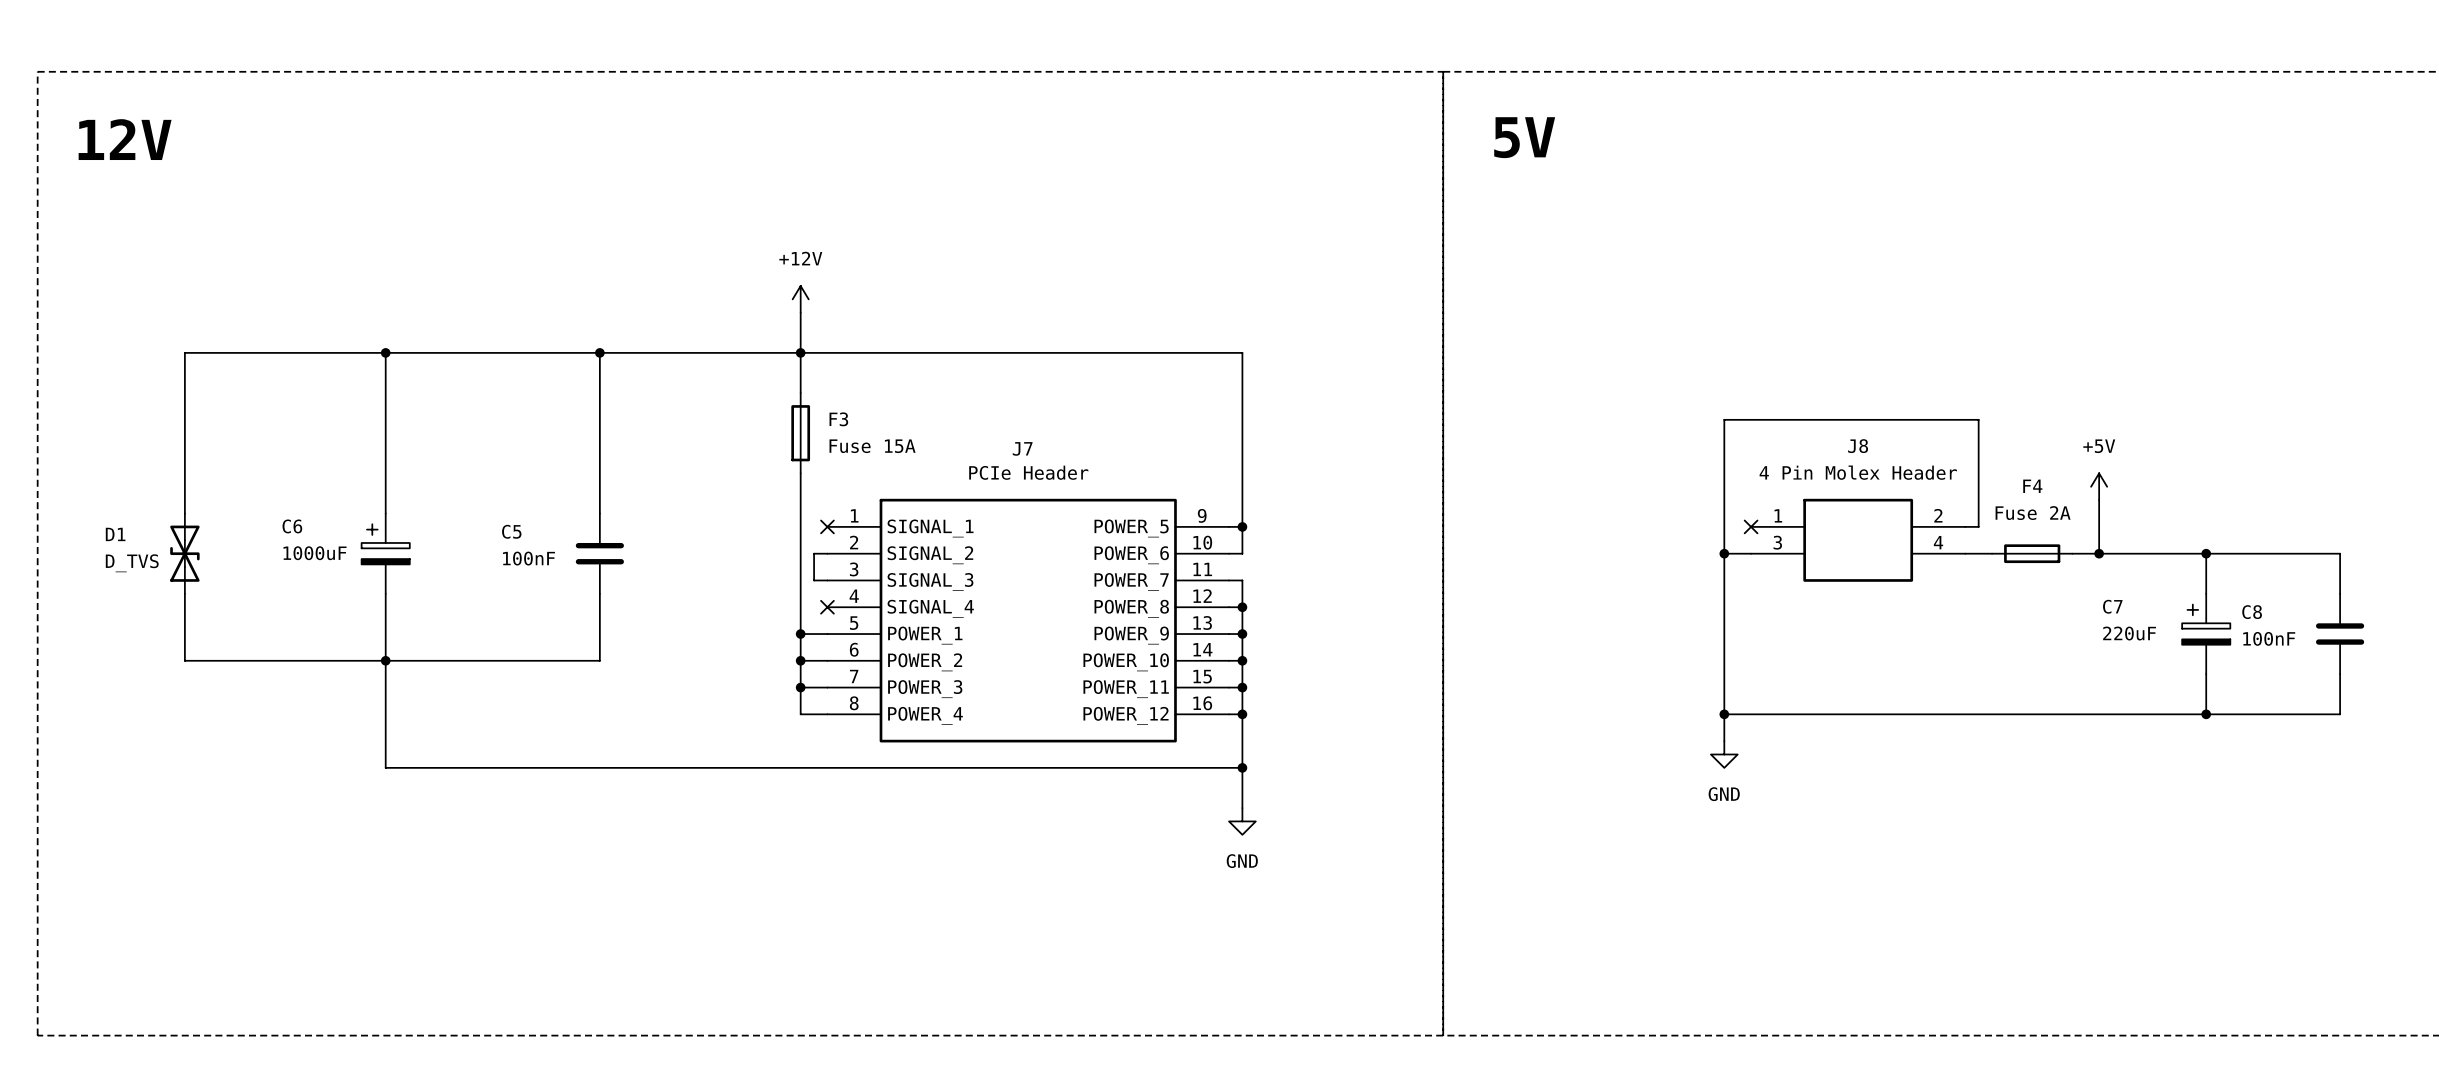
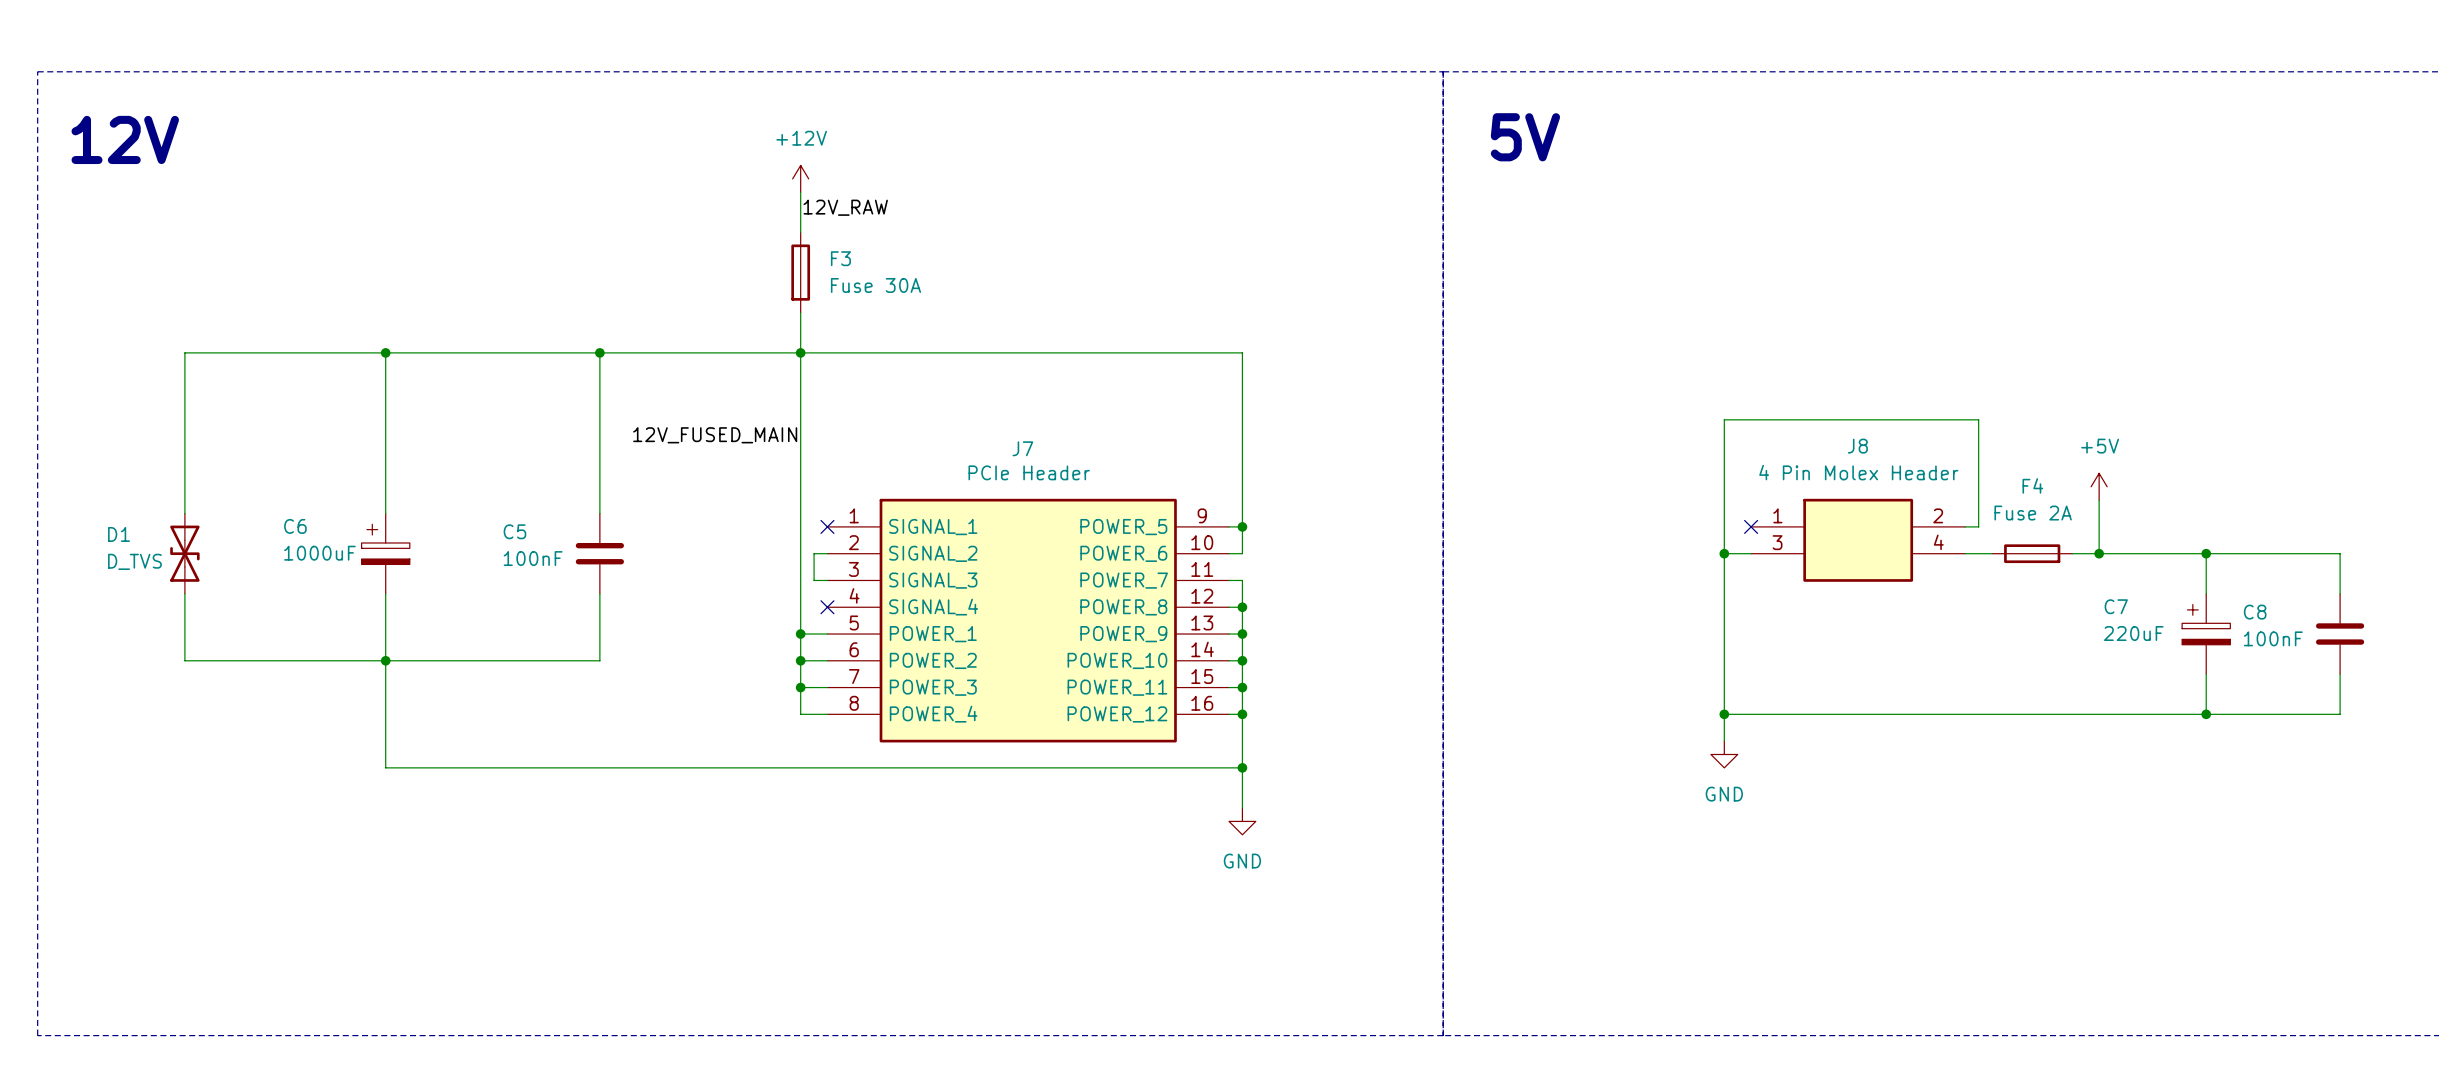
wire: none -> (800, 192) (800, 232)
label: none -> 12V_RAW (845, 207)
power symbol position: +12V (800, 299) -> +12V (800, 178)
F3 position: (800, 433) -> (800, 272)
label: none -> 12V_FUSED_MAIN (715, 435)
F3 value: Fuse 15A (872, 446) -> Fuse 30A (875, 285)

